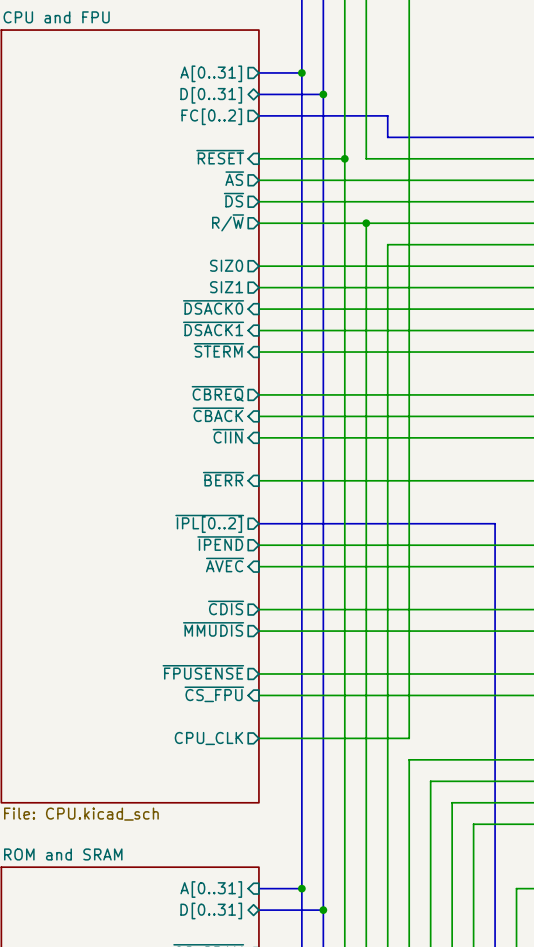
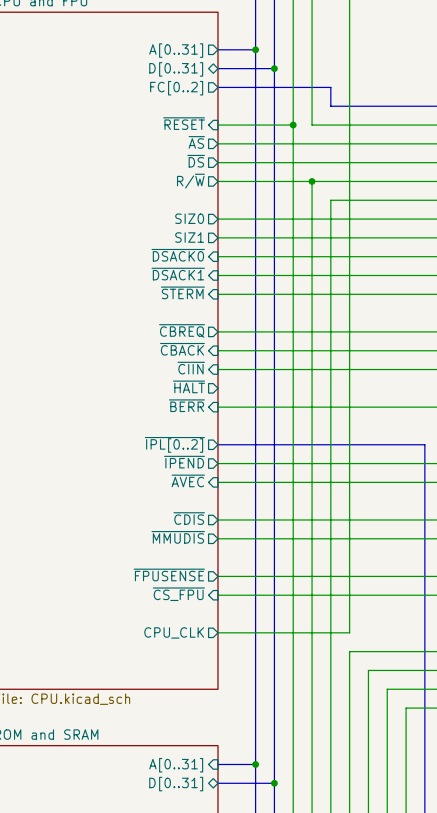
sheet pin: none -> ~{HALT} (188, 386)

